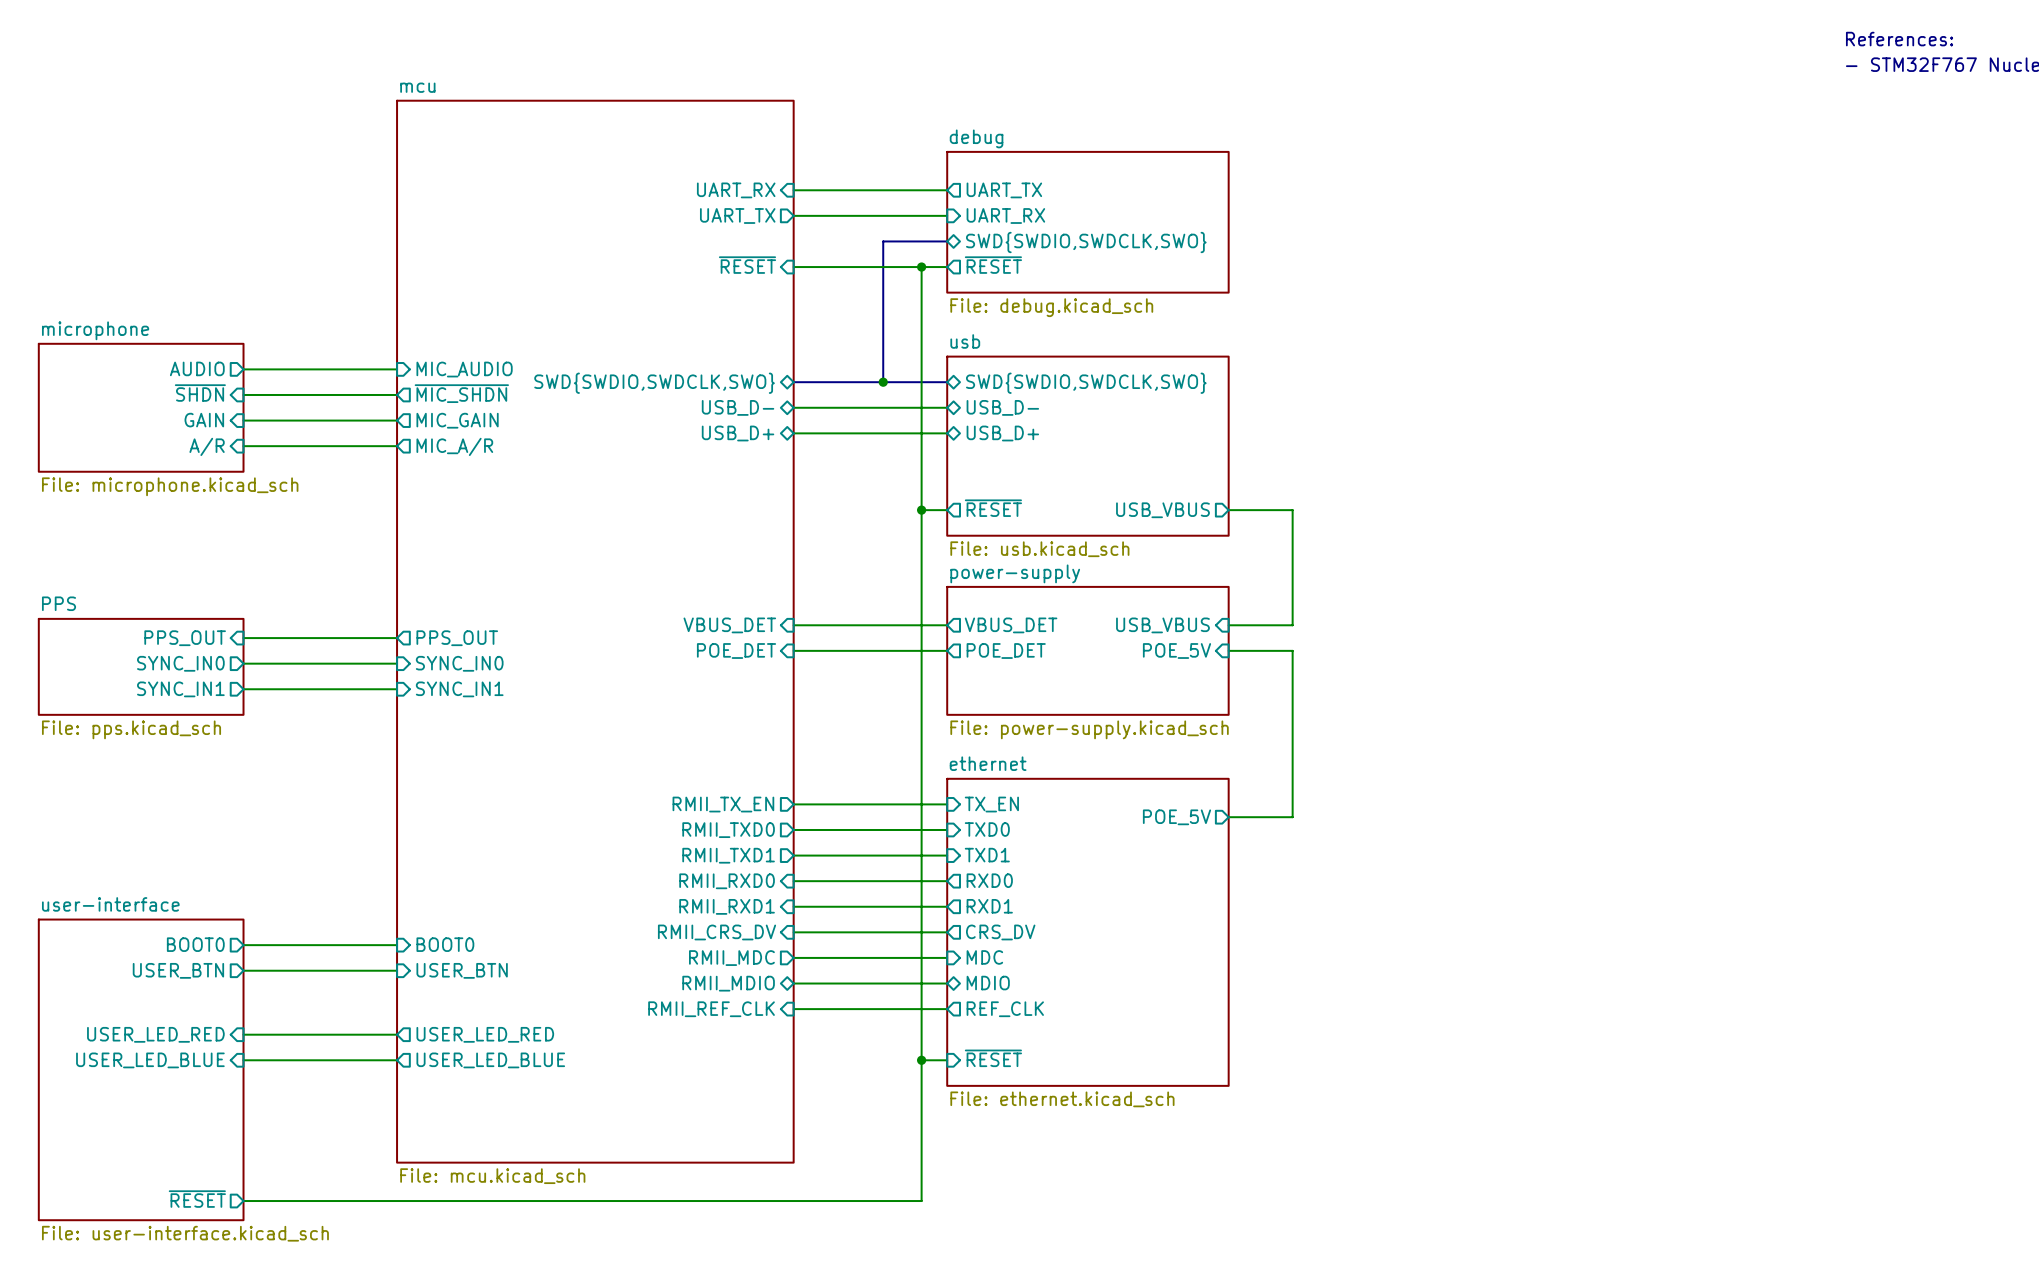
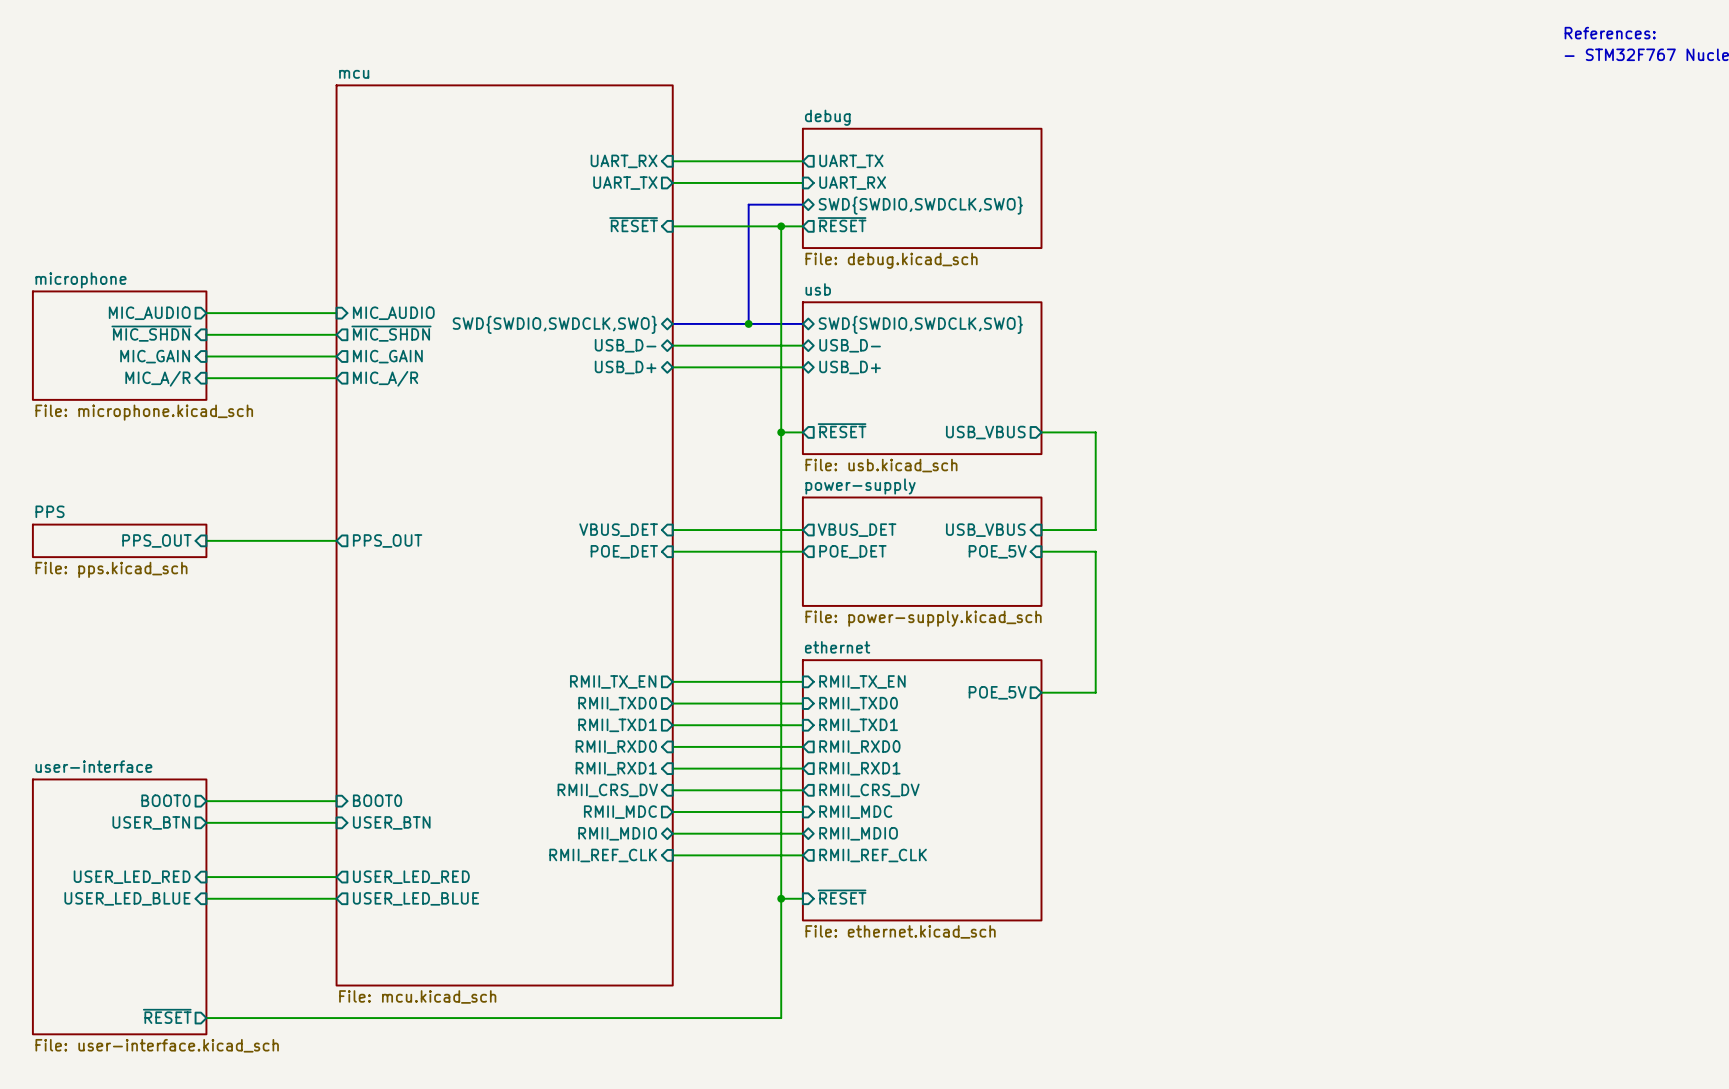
sheet pin: AUDIO (197, 368) -> MIC_AUDIO (149, 313)
sheet pin: ~{SHDN} (200, 393) -> ~{MIC_SHDN} (151, 333)
sheet pin: GAIN (204, 420) -> MIC_GAIN (155, 356)
sheet pin: A/R (207, 446) -> MIC_A/R (157, 378)
sheet PPS: none -> File: pps.kicad_sch (119, 540)
sheet pin: SYNC_IN0 (180, 663) -> none
wire: (243, 663) (397, 663) -> none
sheet pin: SYNC_IN0 (459, 663) -> none
sheet PPS: File: pps.kicad_sch (141, 666) -> none
sheet pin: SYNC_IN1 (180, 689) -> none
wire: (243, 689) (397, 689) -> none
sheet pin: SYNC_IN1 (459, 689) -> none
sheet pin: TX_EN (991, 804) -> RMII_TX_EN (862, 681)
sheet pin: TXD0 (987, 829) -> RMII_TXD0 (858, 703)
sheet pin: TXD1 (987, 855) -> RMII_TXD1 (858, 725)
sheet pin: RXD0 (989, 880) -> RMII_RXD0 (859, 747)
sheet pin: RXD1 (989, 906) -> RMII_RXD1 (859, 768)
sheet pin: CRS_DV (1000, 932) -> RMII_CRS_DV (869, 790)
sheet pin: MDC (984, 957) -> RMII_MDC (855, 812)
sheet pin: MDIO (988, 983) -> RMII_MDIO (858, 833)
sheet pin: REF_CLK (1005, 1009) -> RMII_REF_CLK (873, 855)

